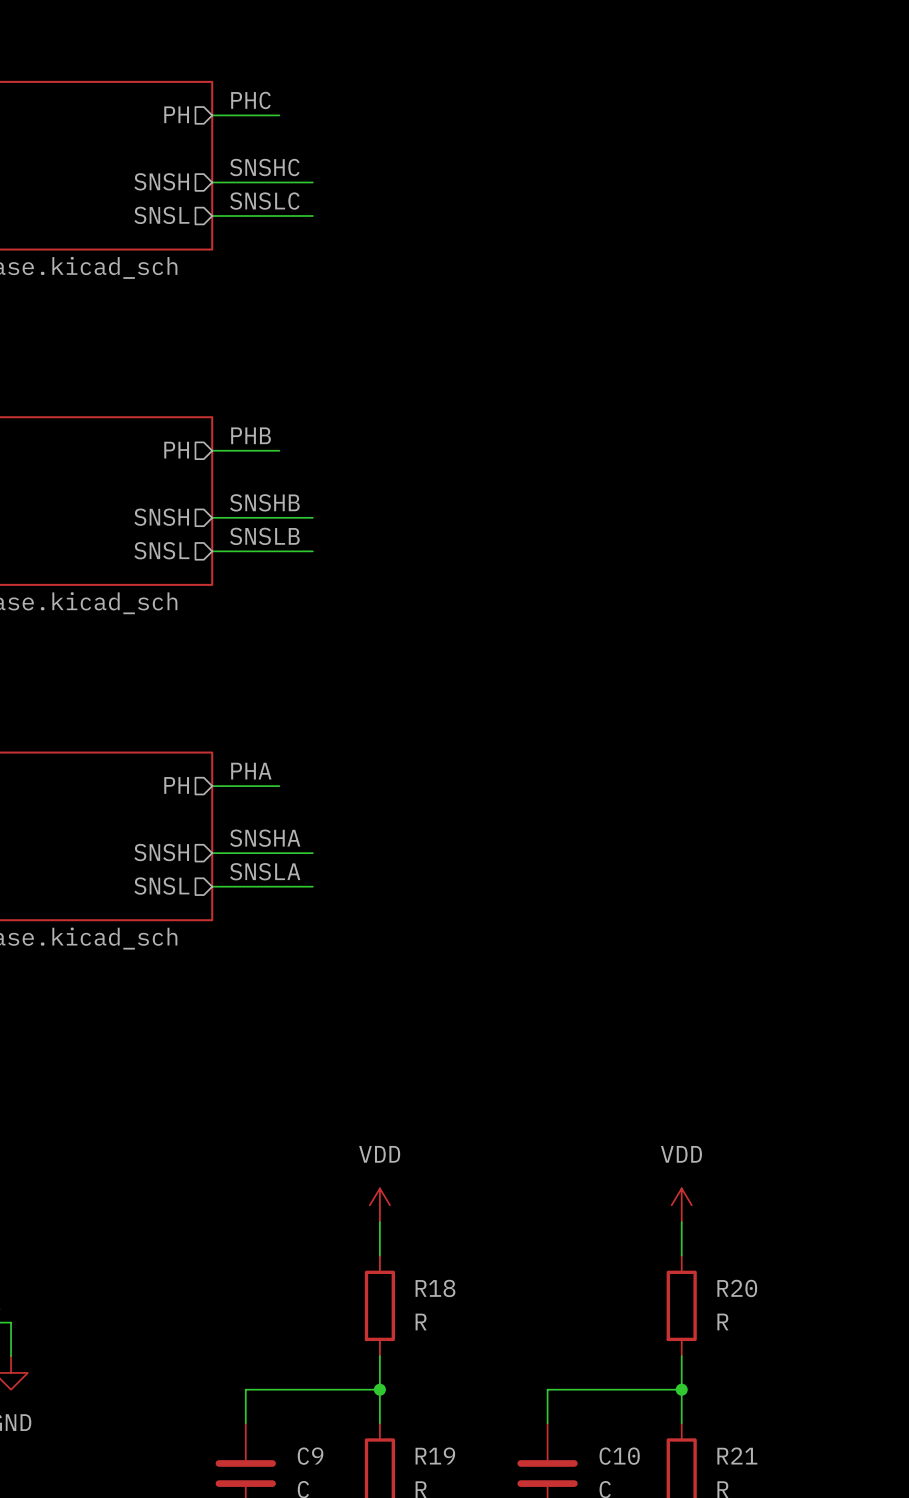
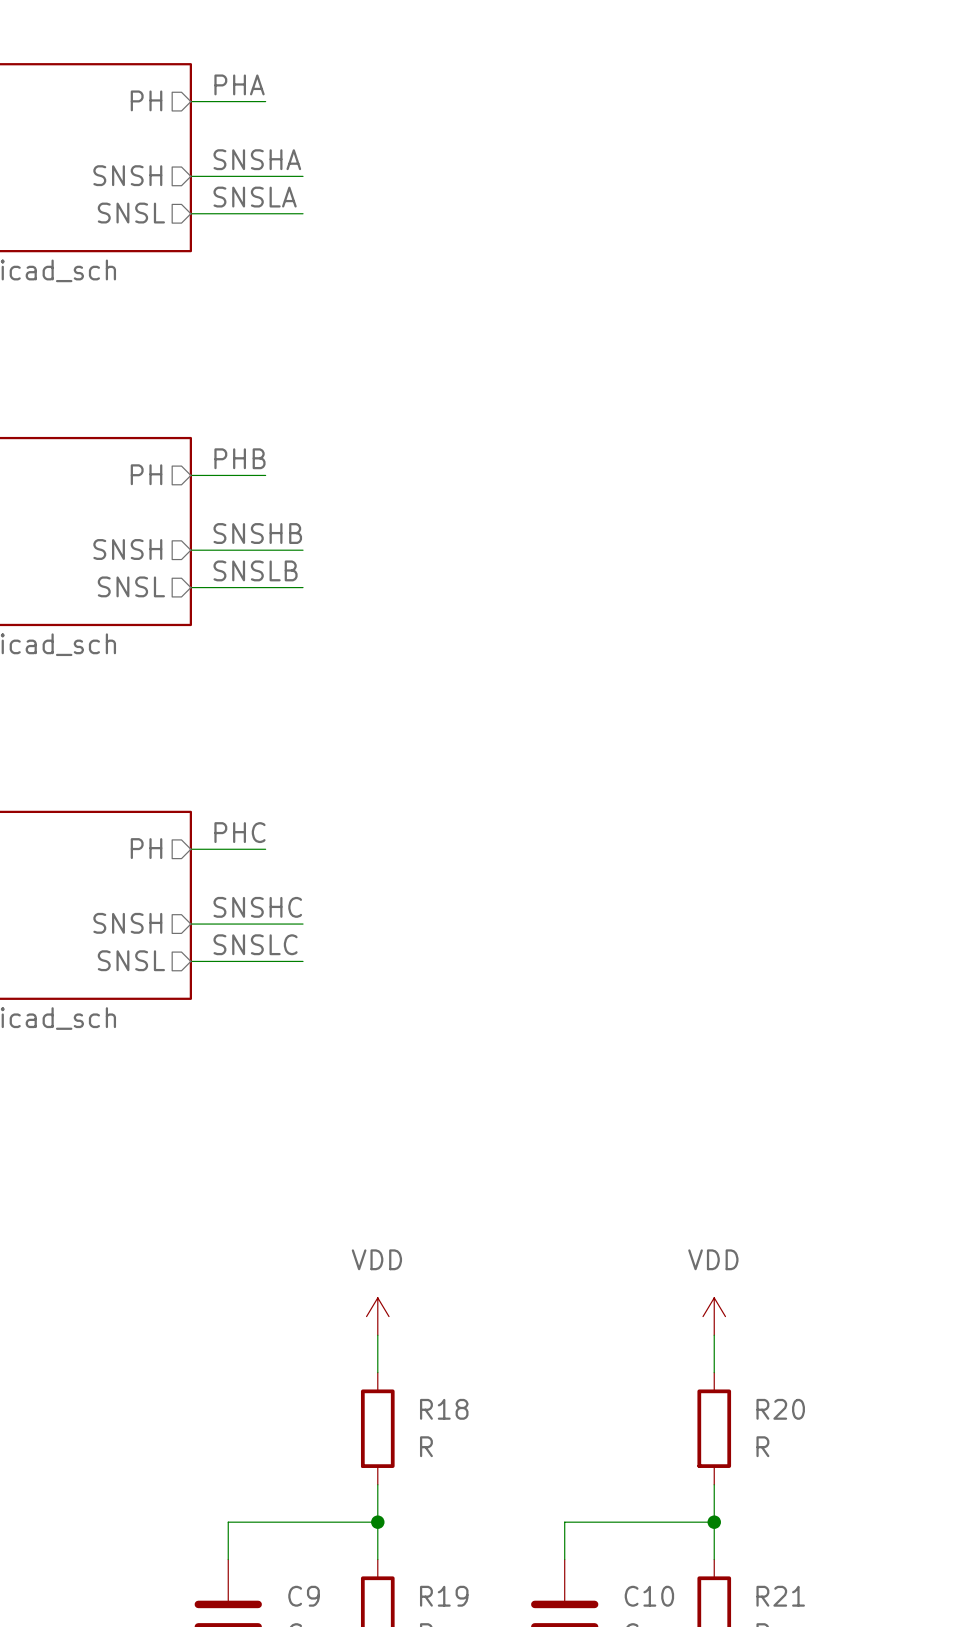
label: PHC (250, 100) -> PHA (239, 84)
label: SNSHC (264, 167) -> SNSHA (257, 159)
label: SNSLC (264, 201) -> SNSLA (255, 197)
label: PHA (251, 771) -> PHC (239, 832)
label: SNSHA (265, 838) -> SNSHC (257, 907)
label: SNSLA (265, 871) -> SNSLC (255, 944)

